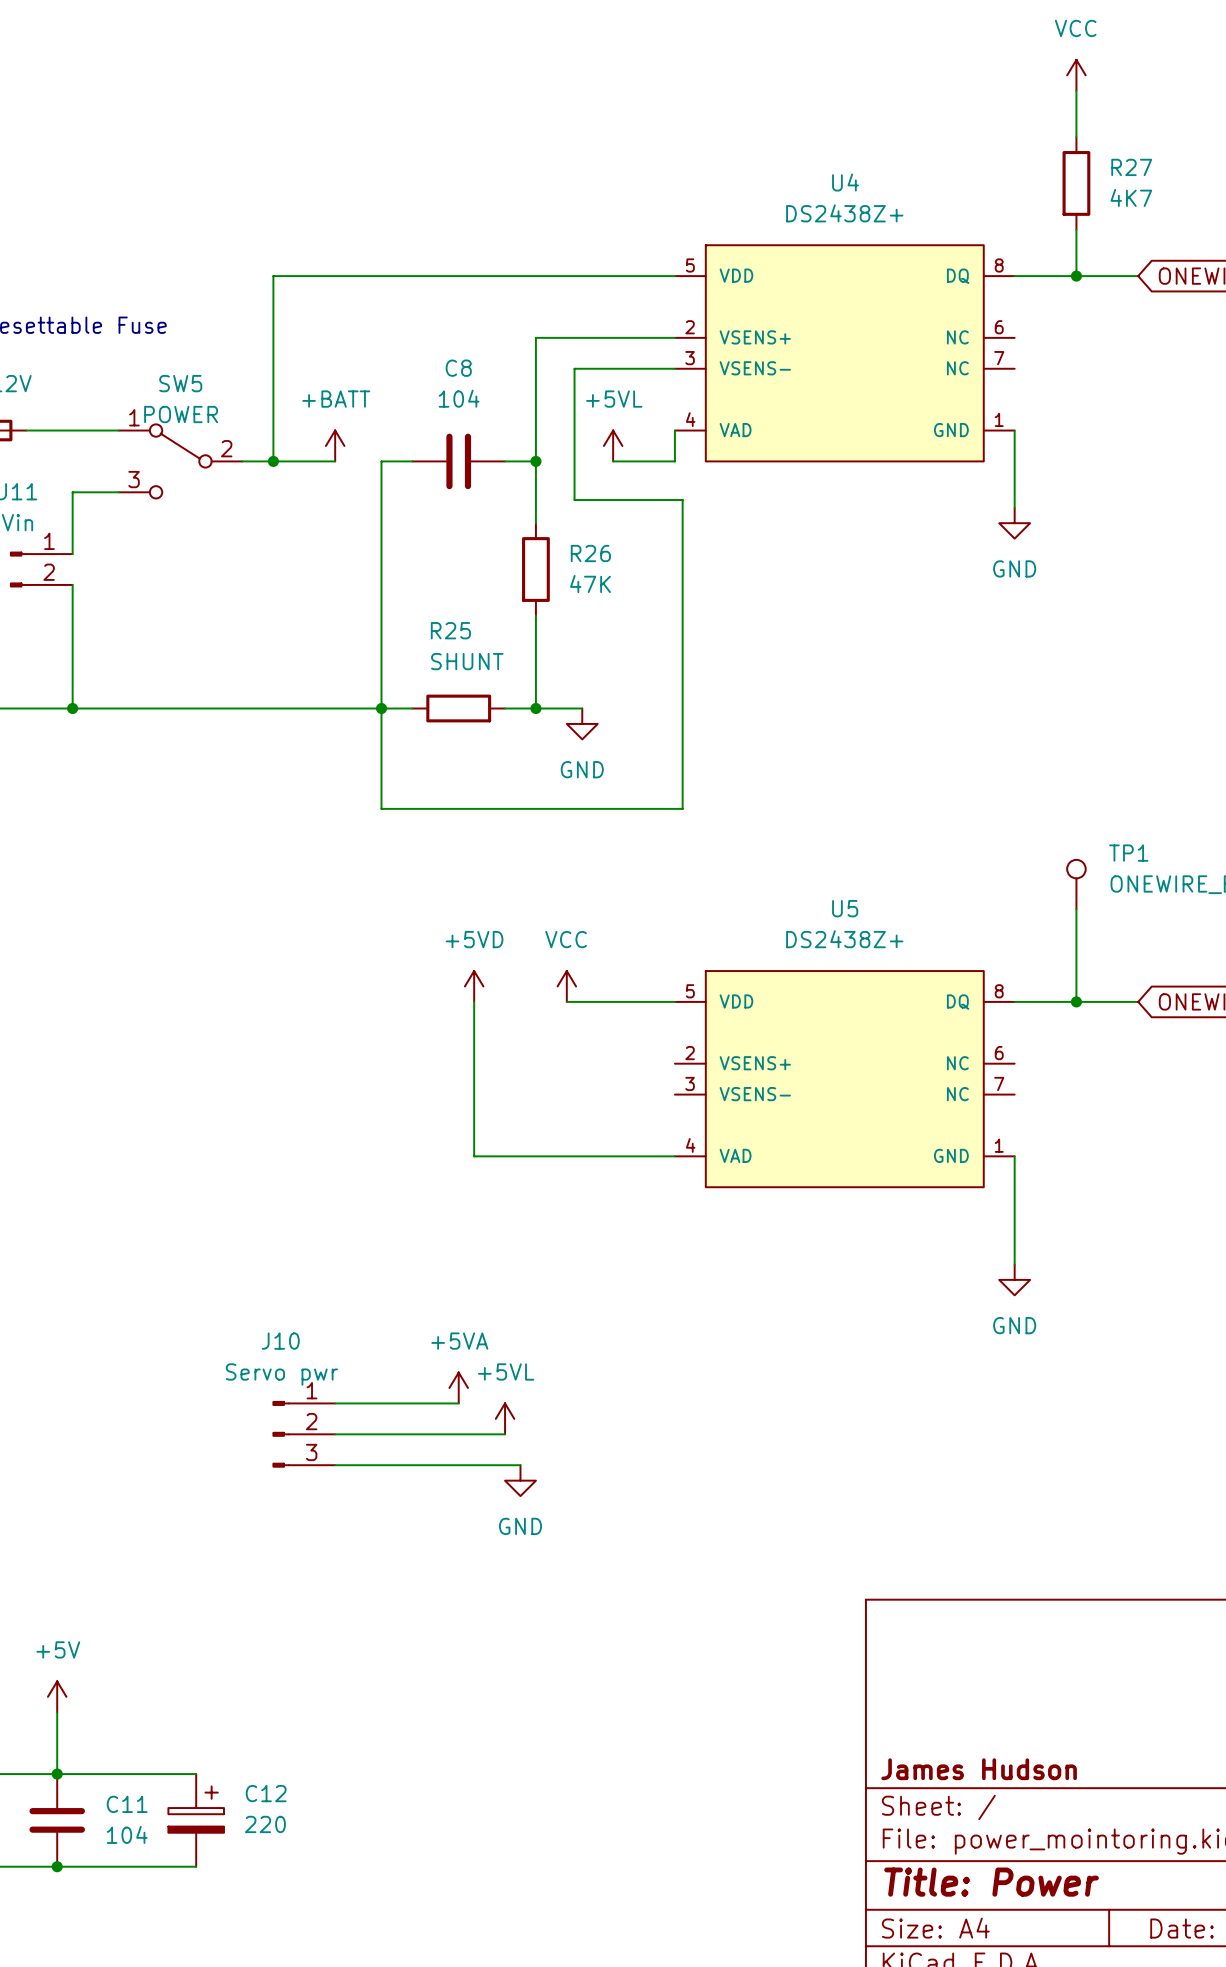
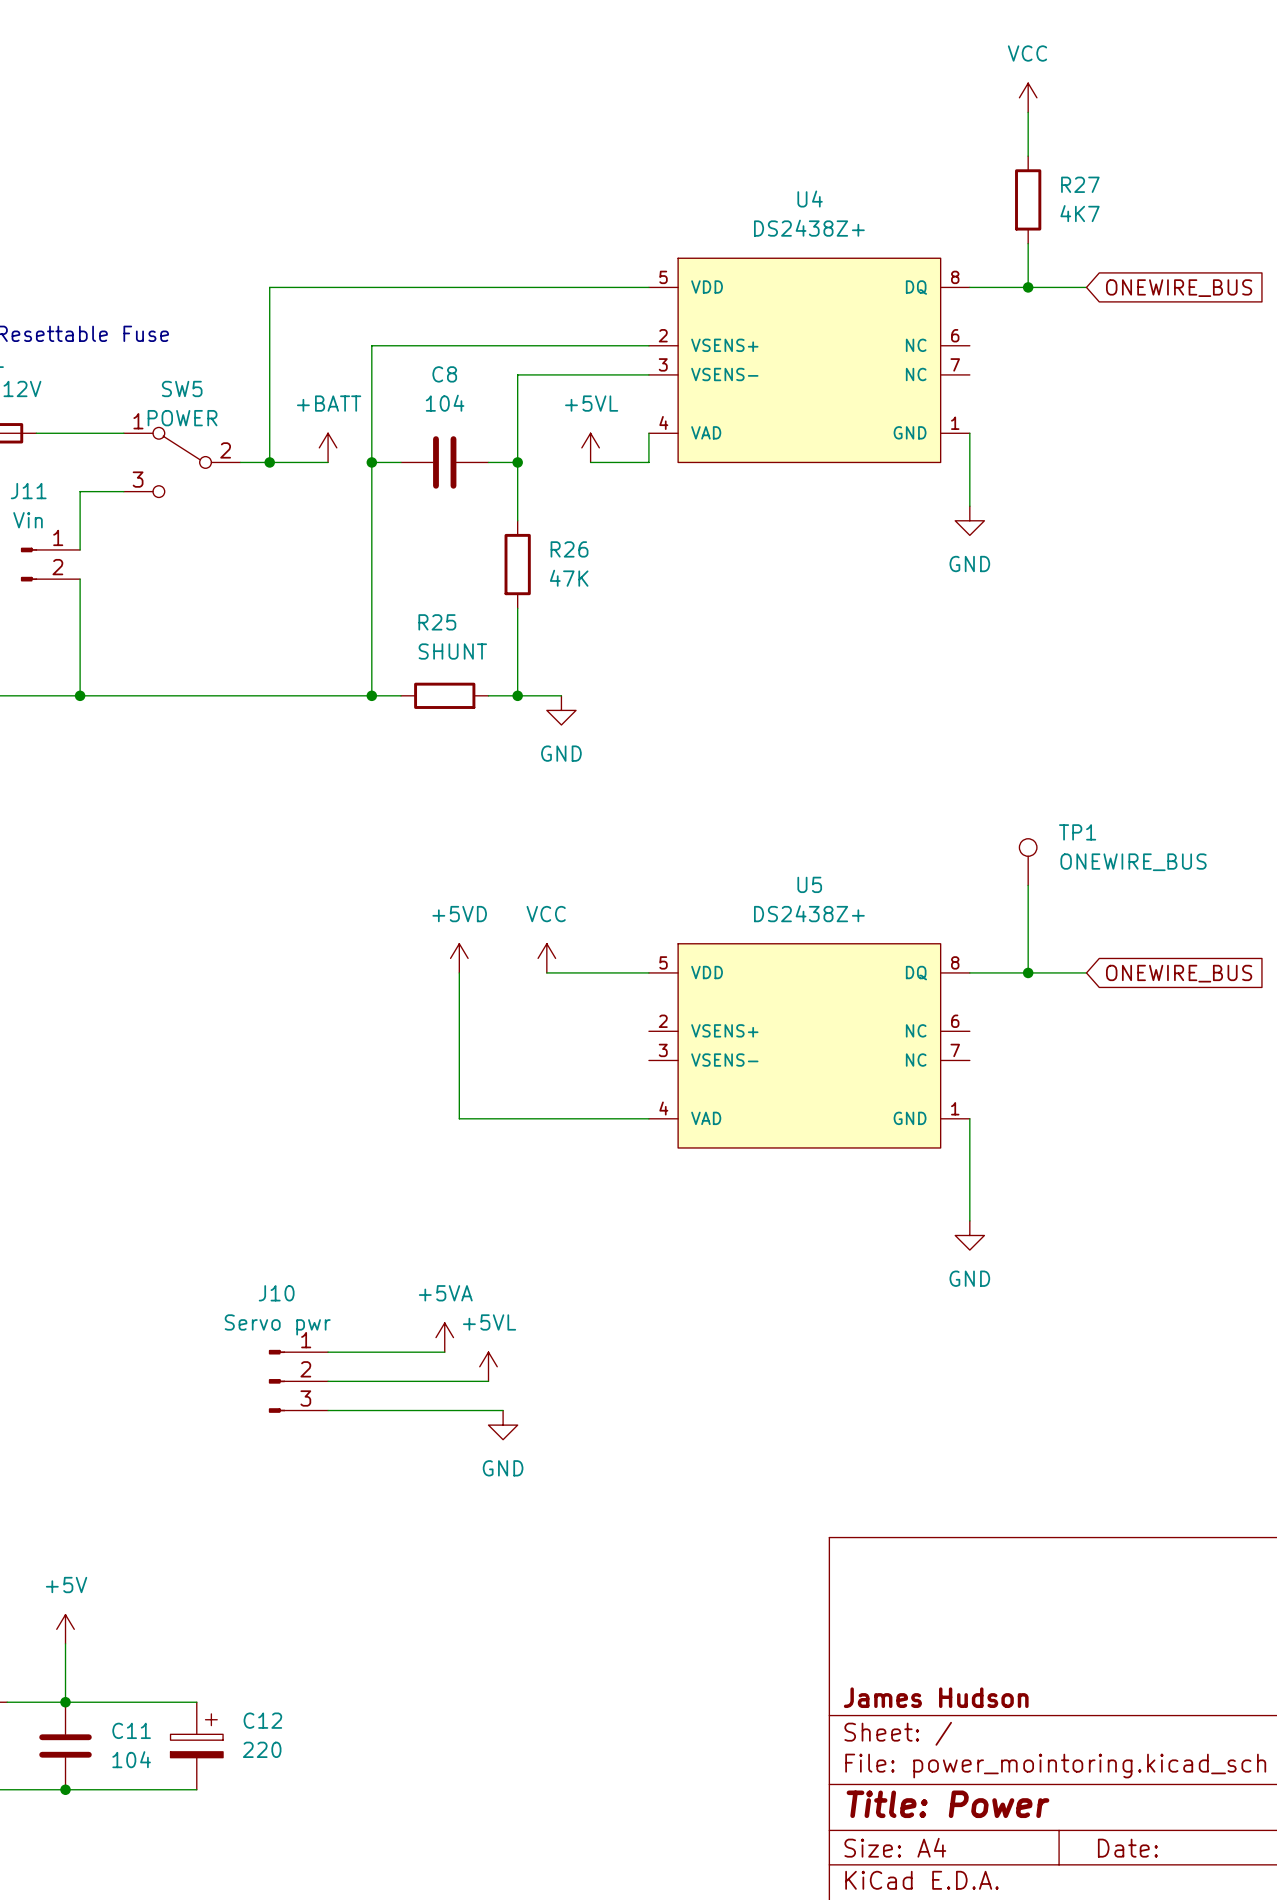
wire: (535, 337) (535, 368) -> (554, 374) (517, 374)
wire: none -> (517, 345) (371, 345) (371, 462)
wire: (574, 368) (574, 500) (682, 500) (682, 808) (381, 808) (381, 708) -> none
junction: none -> (371, 462)

